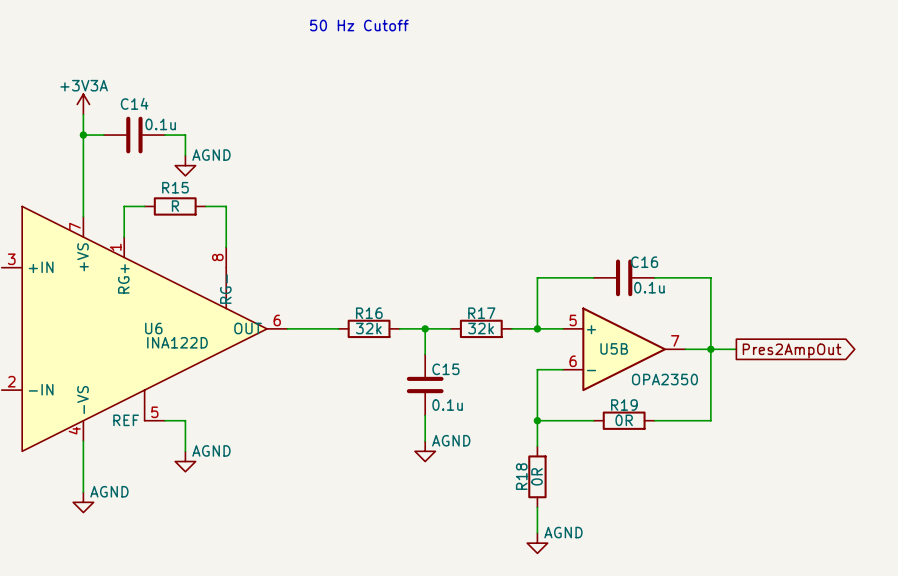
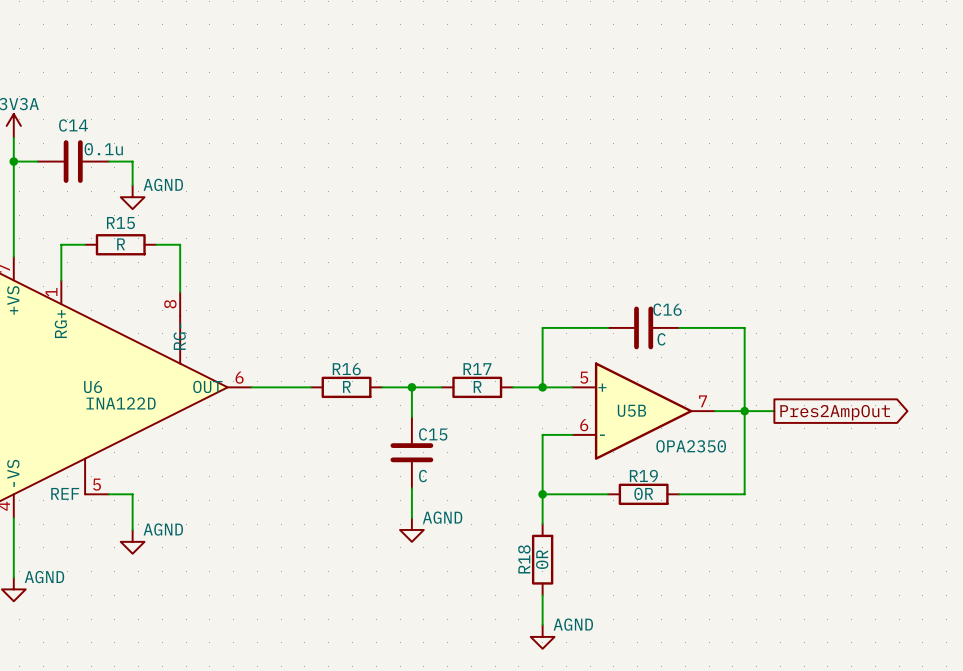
text: 50 Hz Cutoff (359, 25) -> none
C16 value: 0.1u (649, 287) -> C (661, 339)
R16 value: 32k (368, 328) -> R (346, 386)
R17 value: 32k (481, 328) -> R (477, 386)
C15 value: 0.1u (447, 405) -> C (423, 476)

